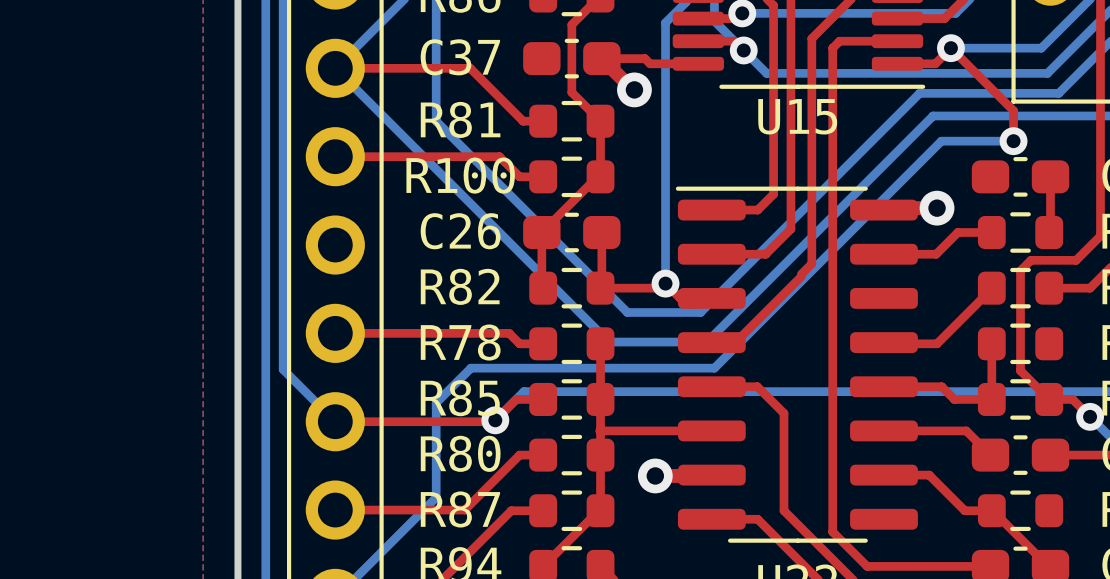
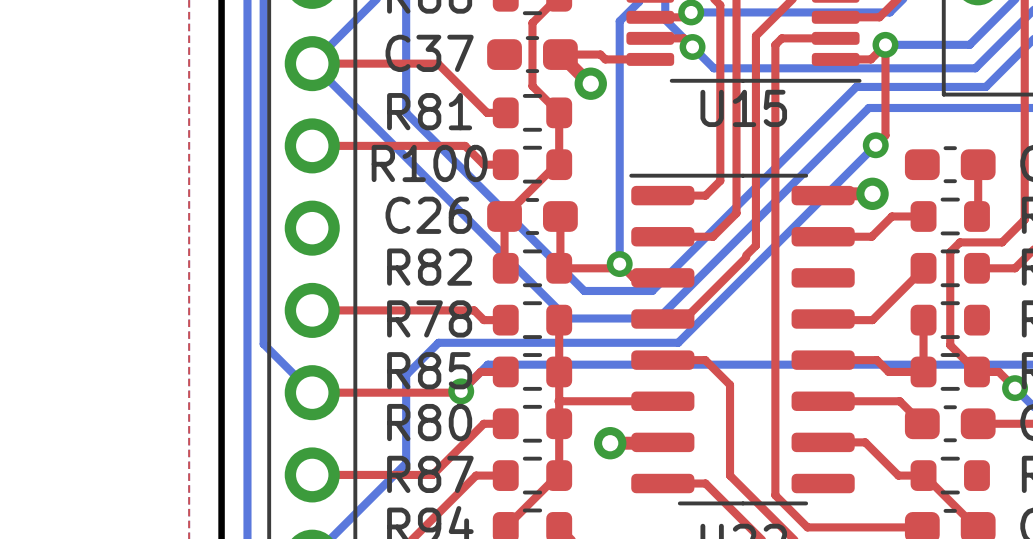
top track: (950, 48) (1013, 110) (1013, 141) -> (885, 44) (885, 135) (875, 145)
bottom track: (1013, 141) (941, 141) (714, 368) -> (875, 145) (678, 342) (665, 342)
via position: (1013, 141) -> (875, 145)

